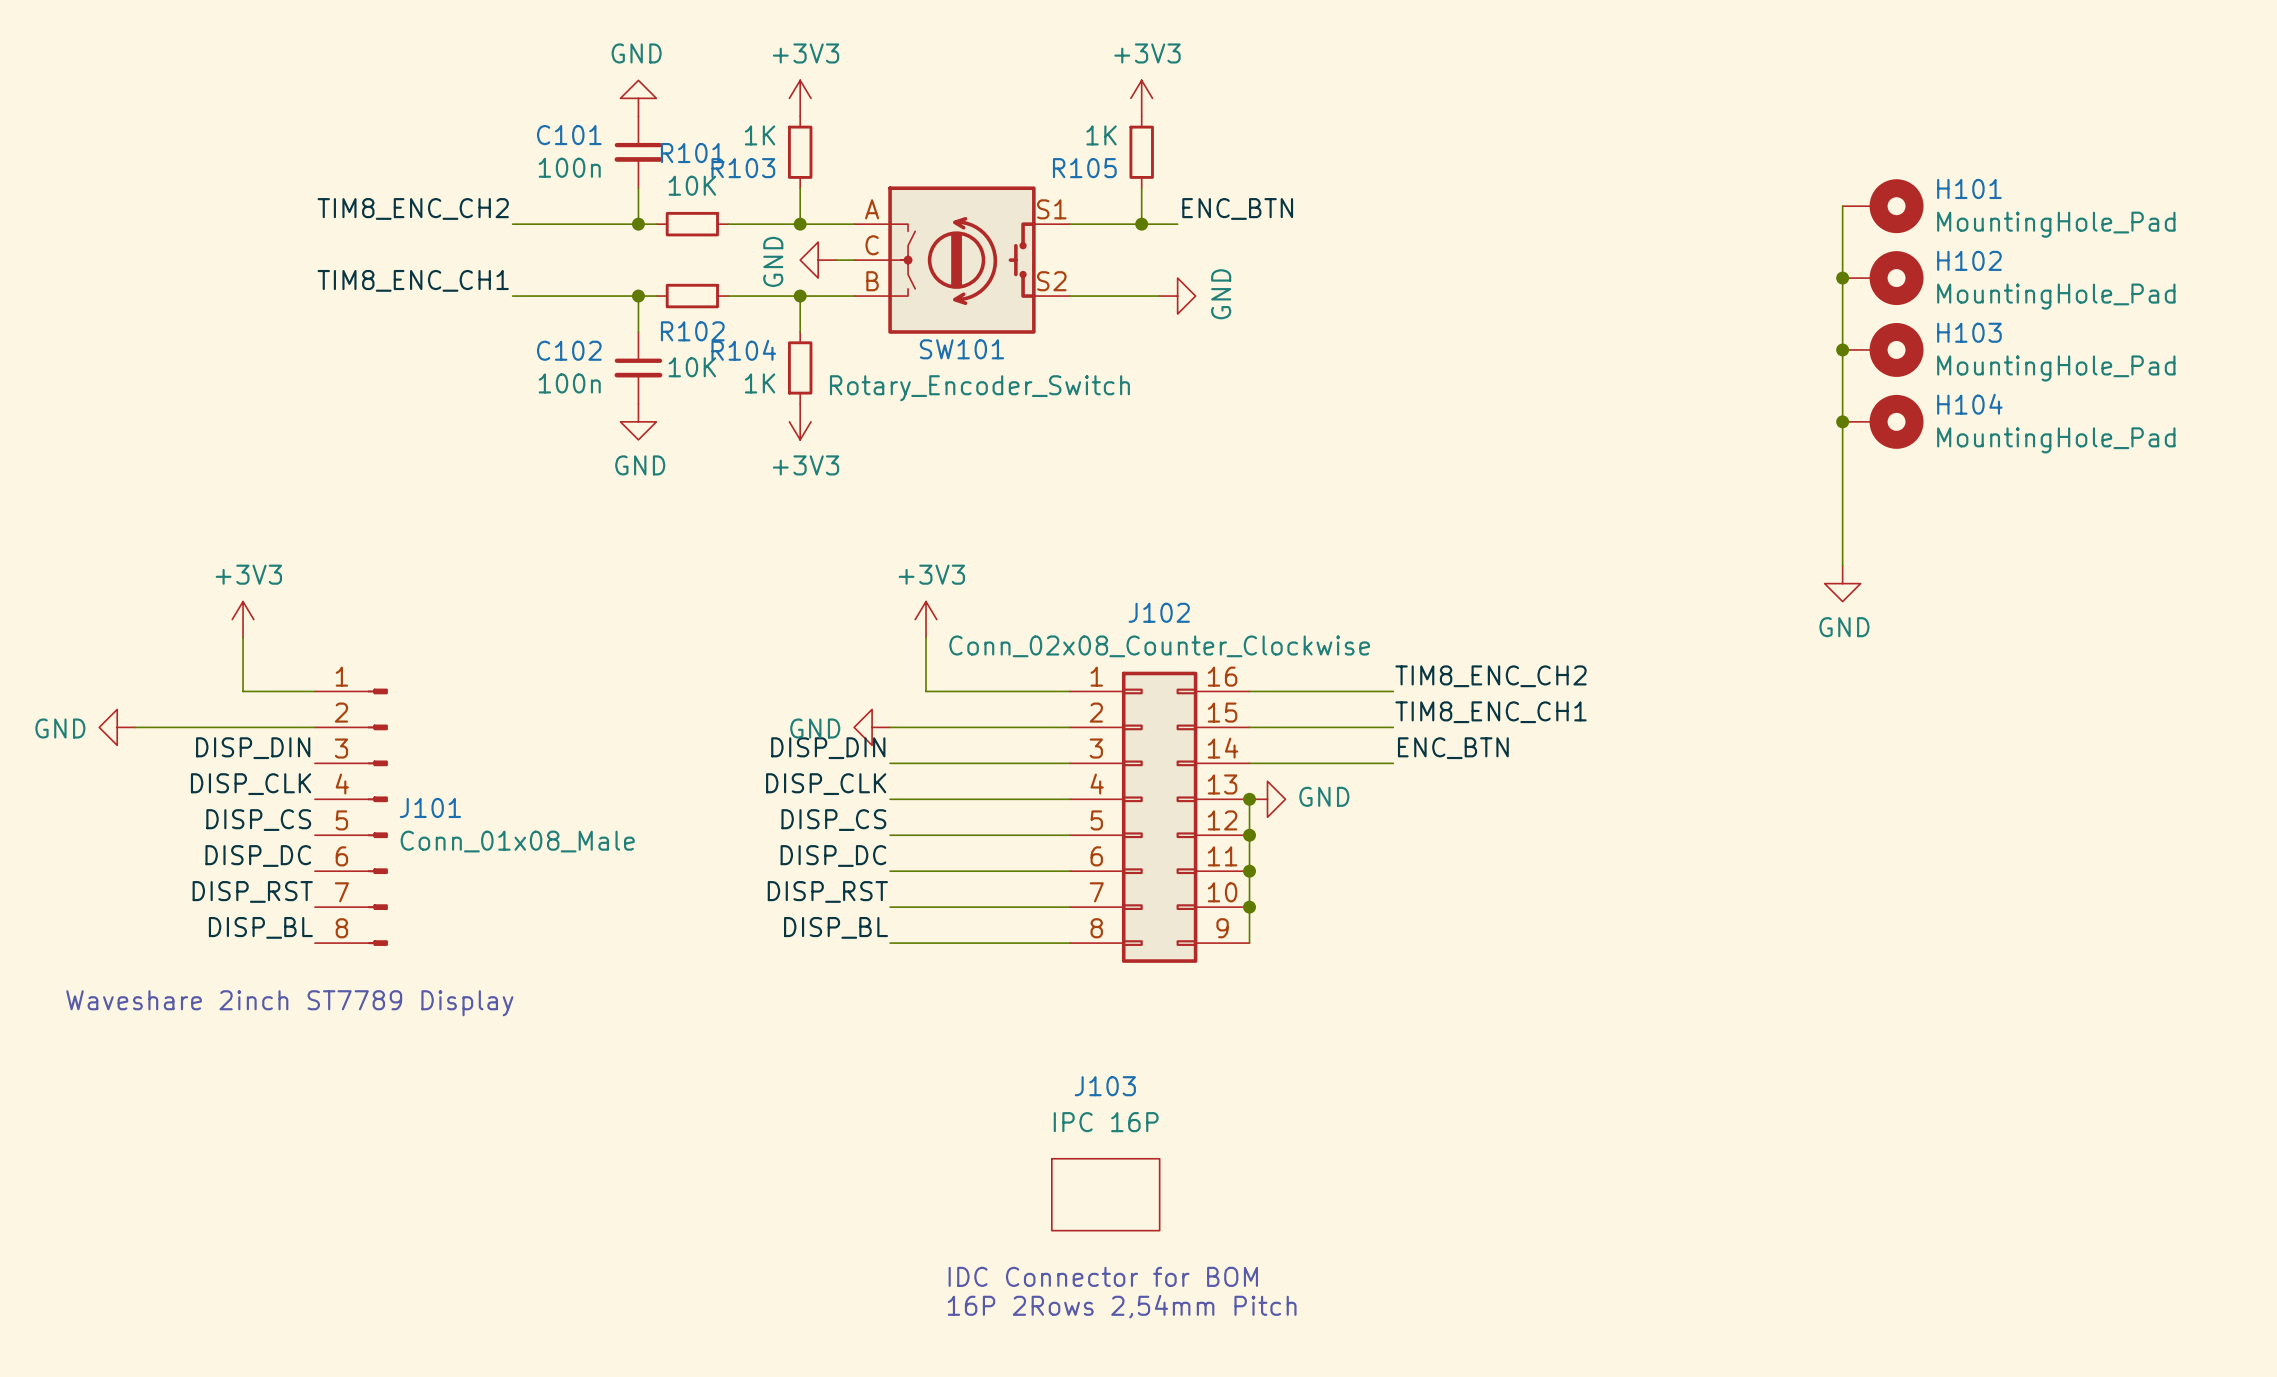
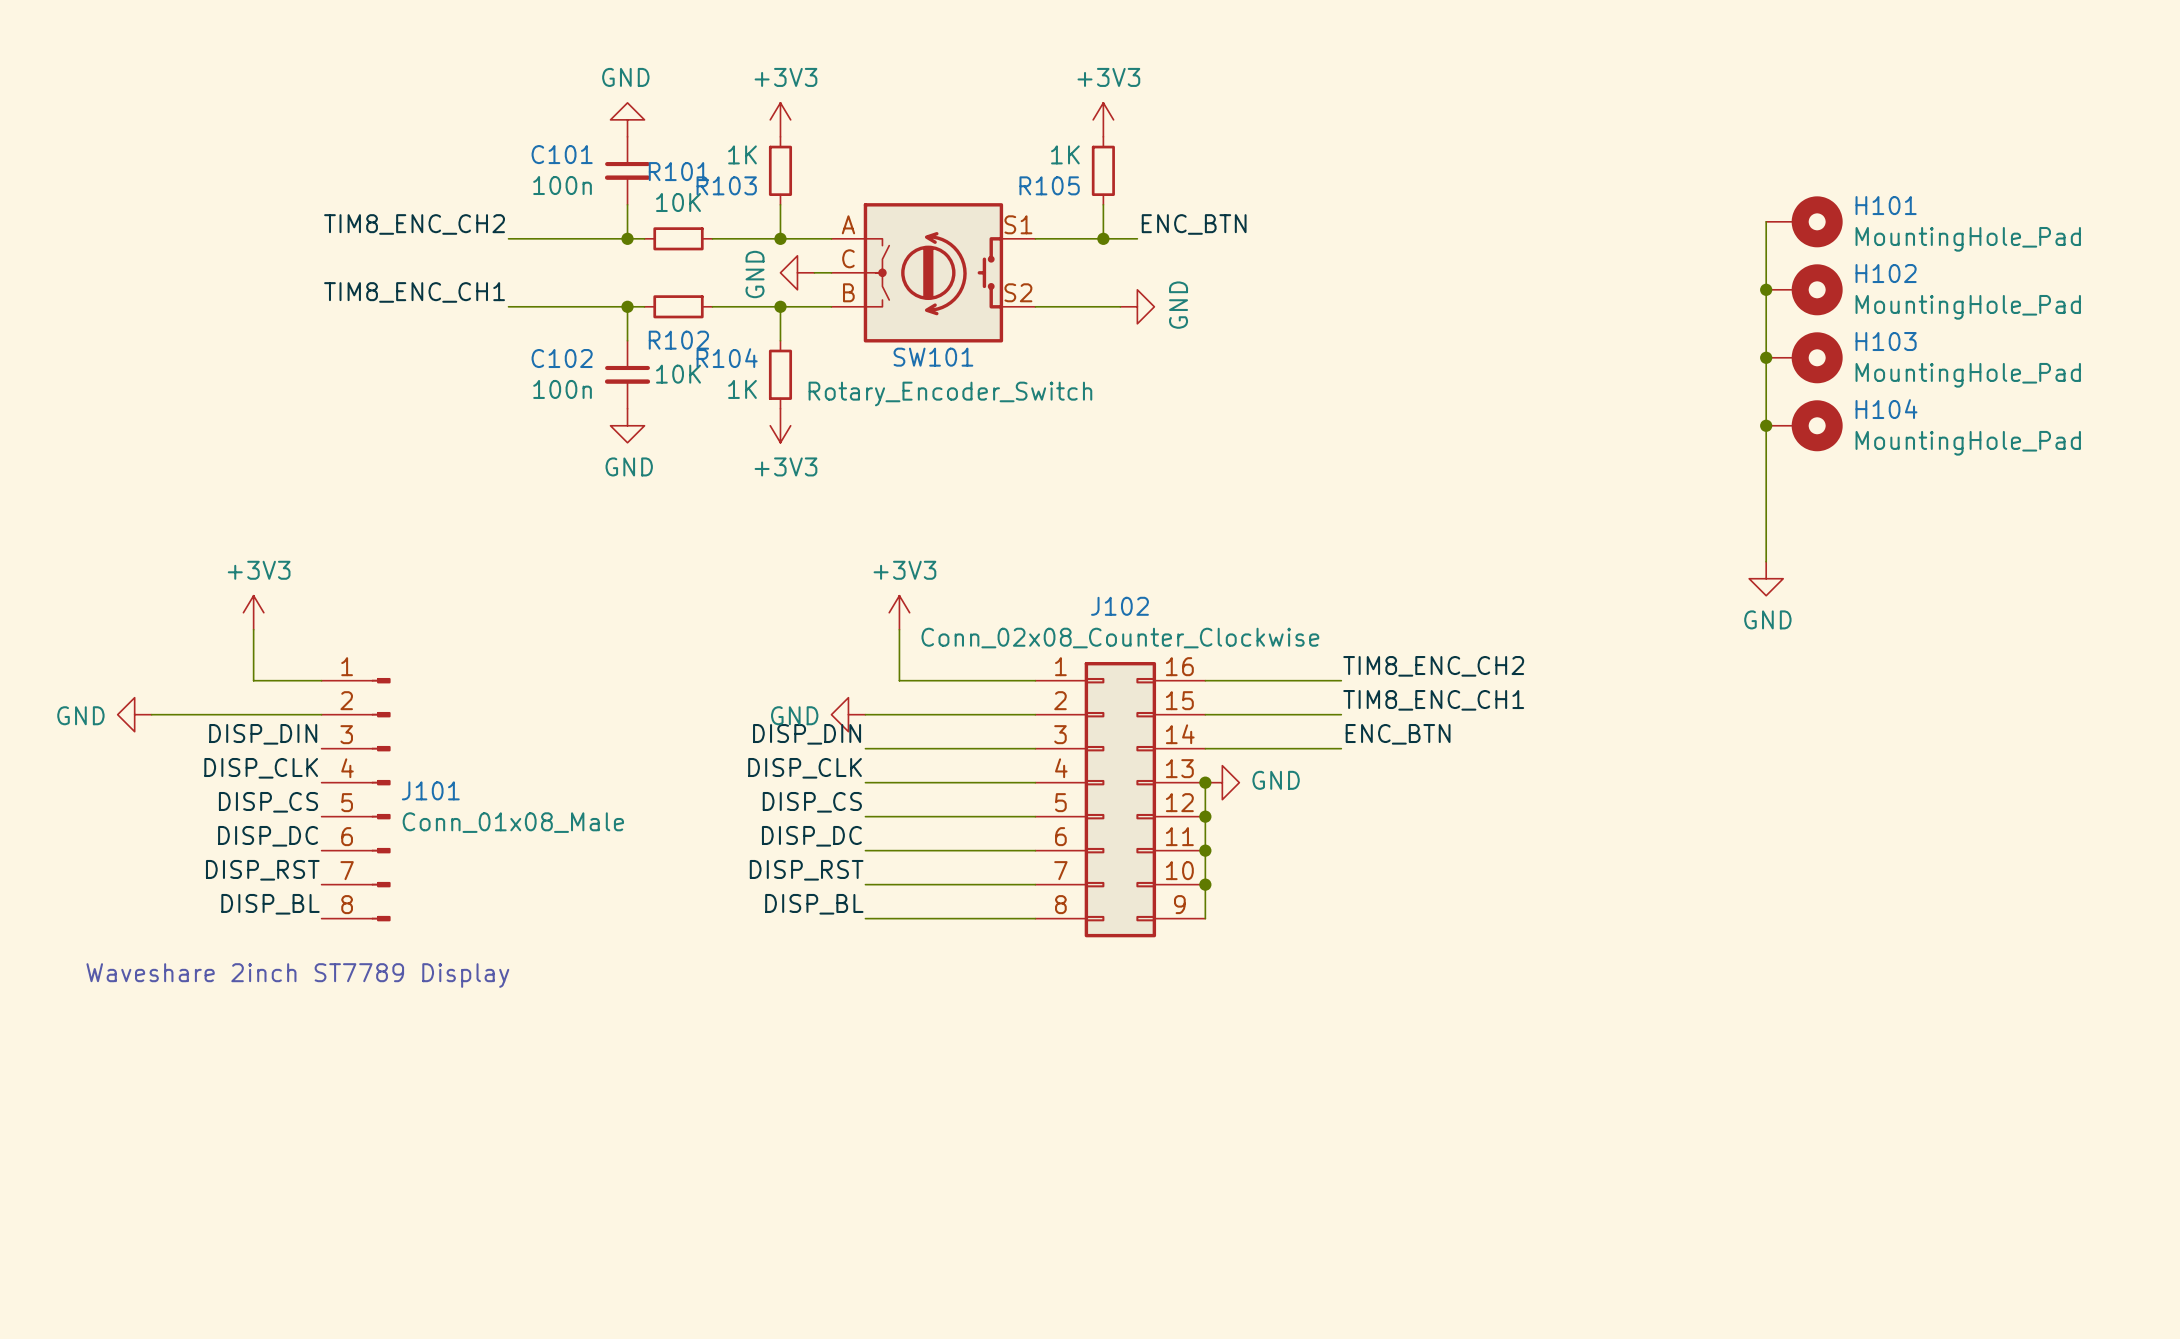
J103: IPC 16P (1105, 1194) -> none
text: IDC Connector for BOM (1103, 1276) -> none
text: 16P 2Rows 2,54mm Pitch (1122, 1306) -> none

